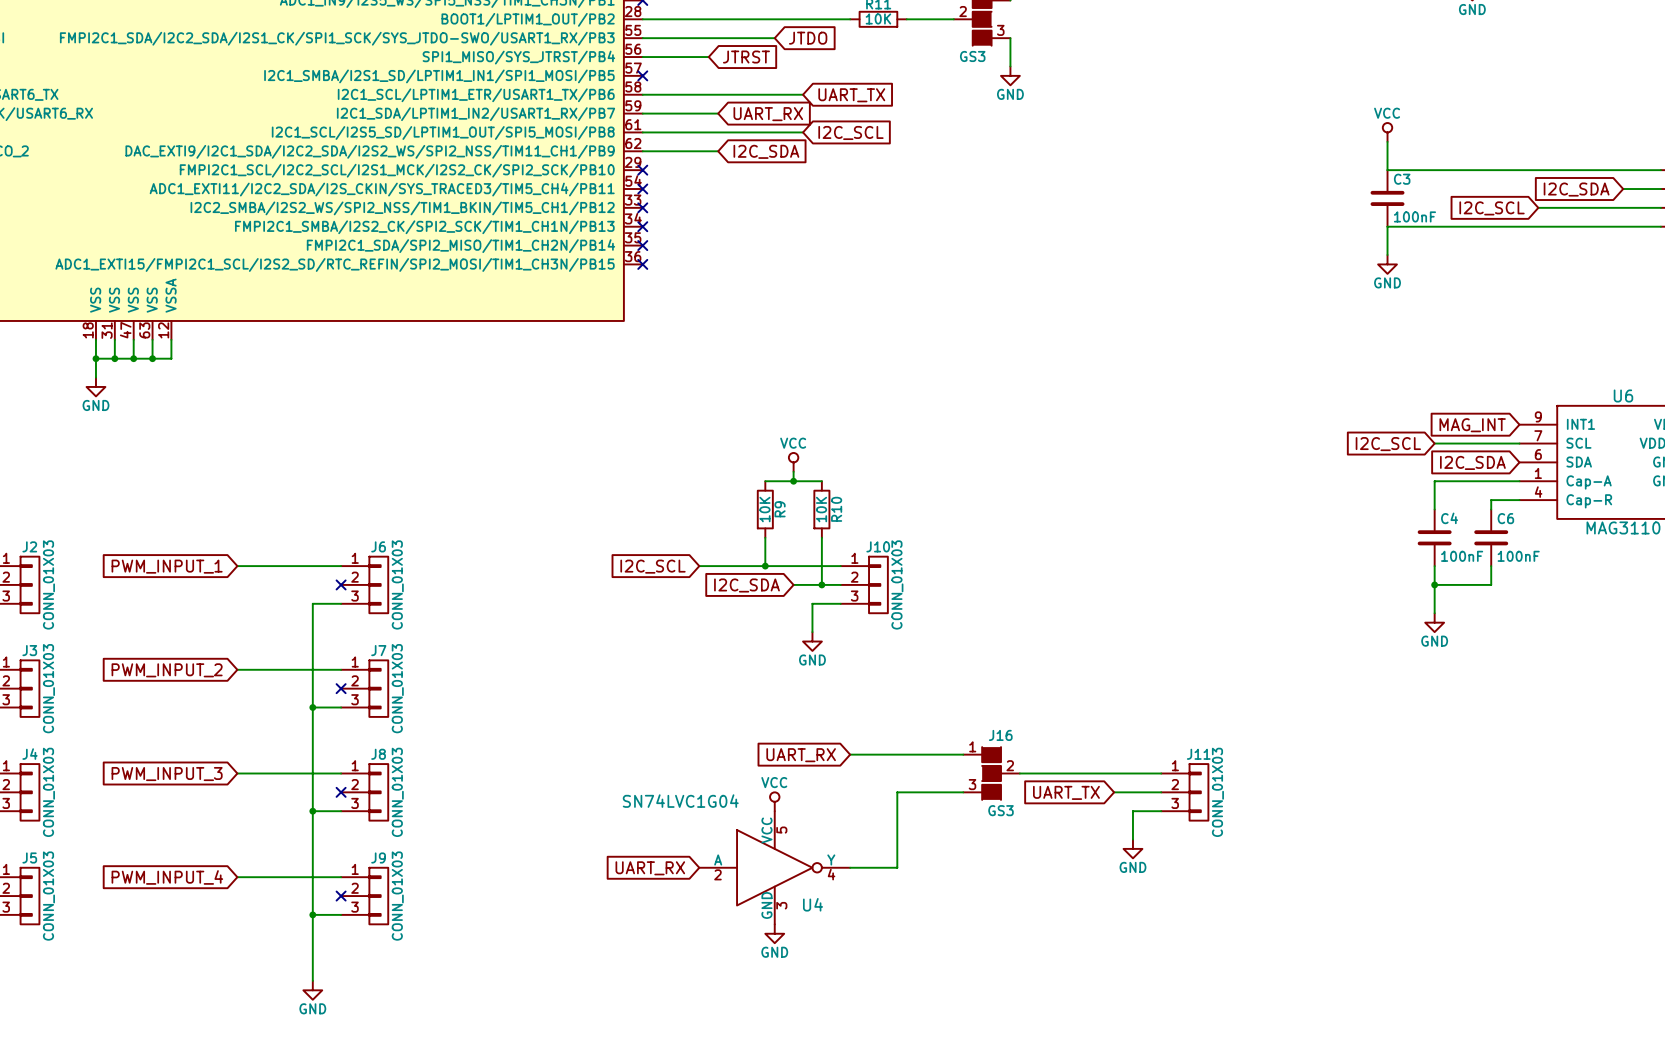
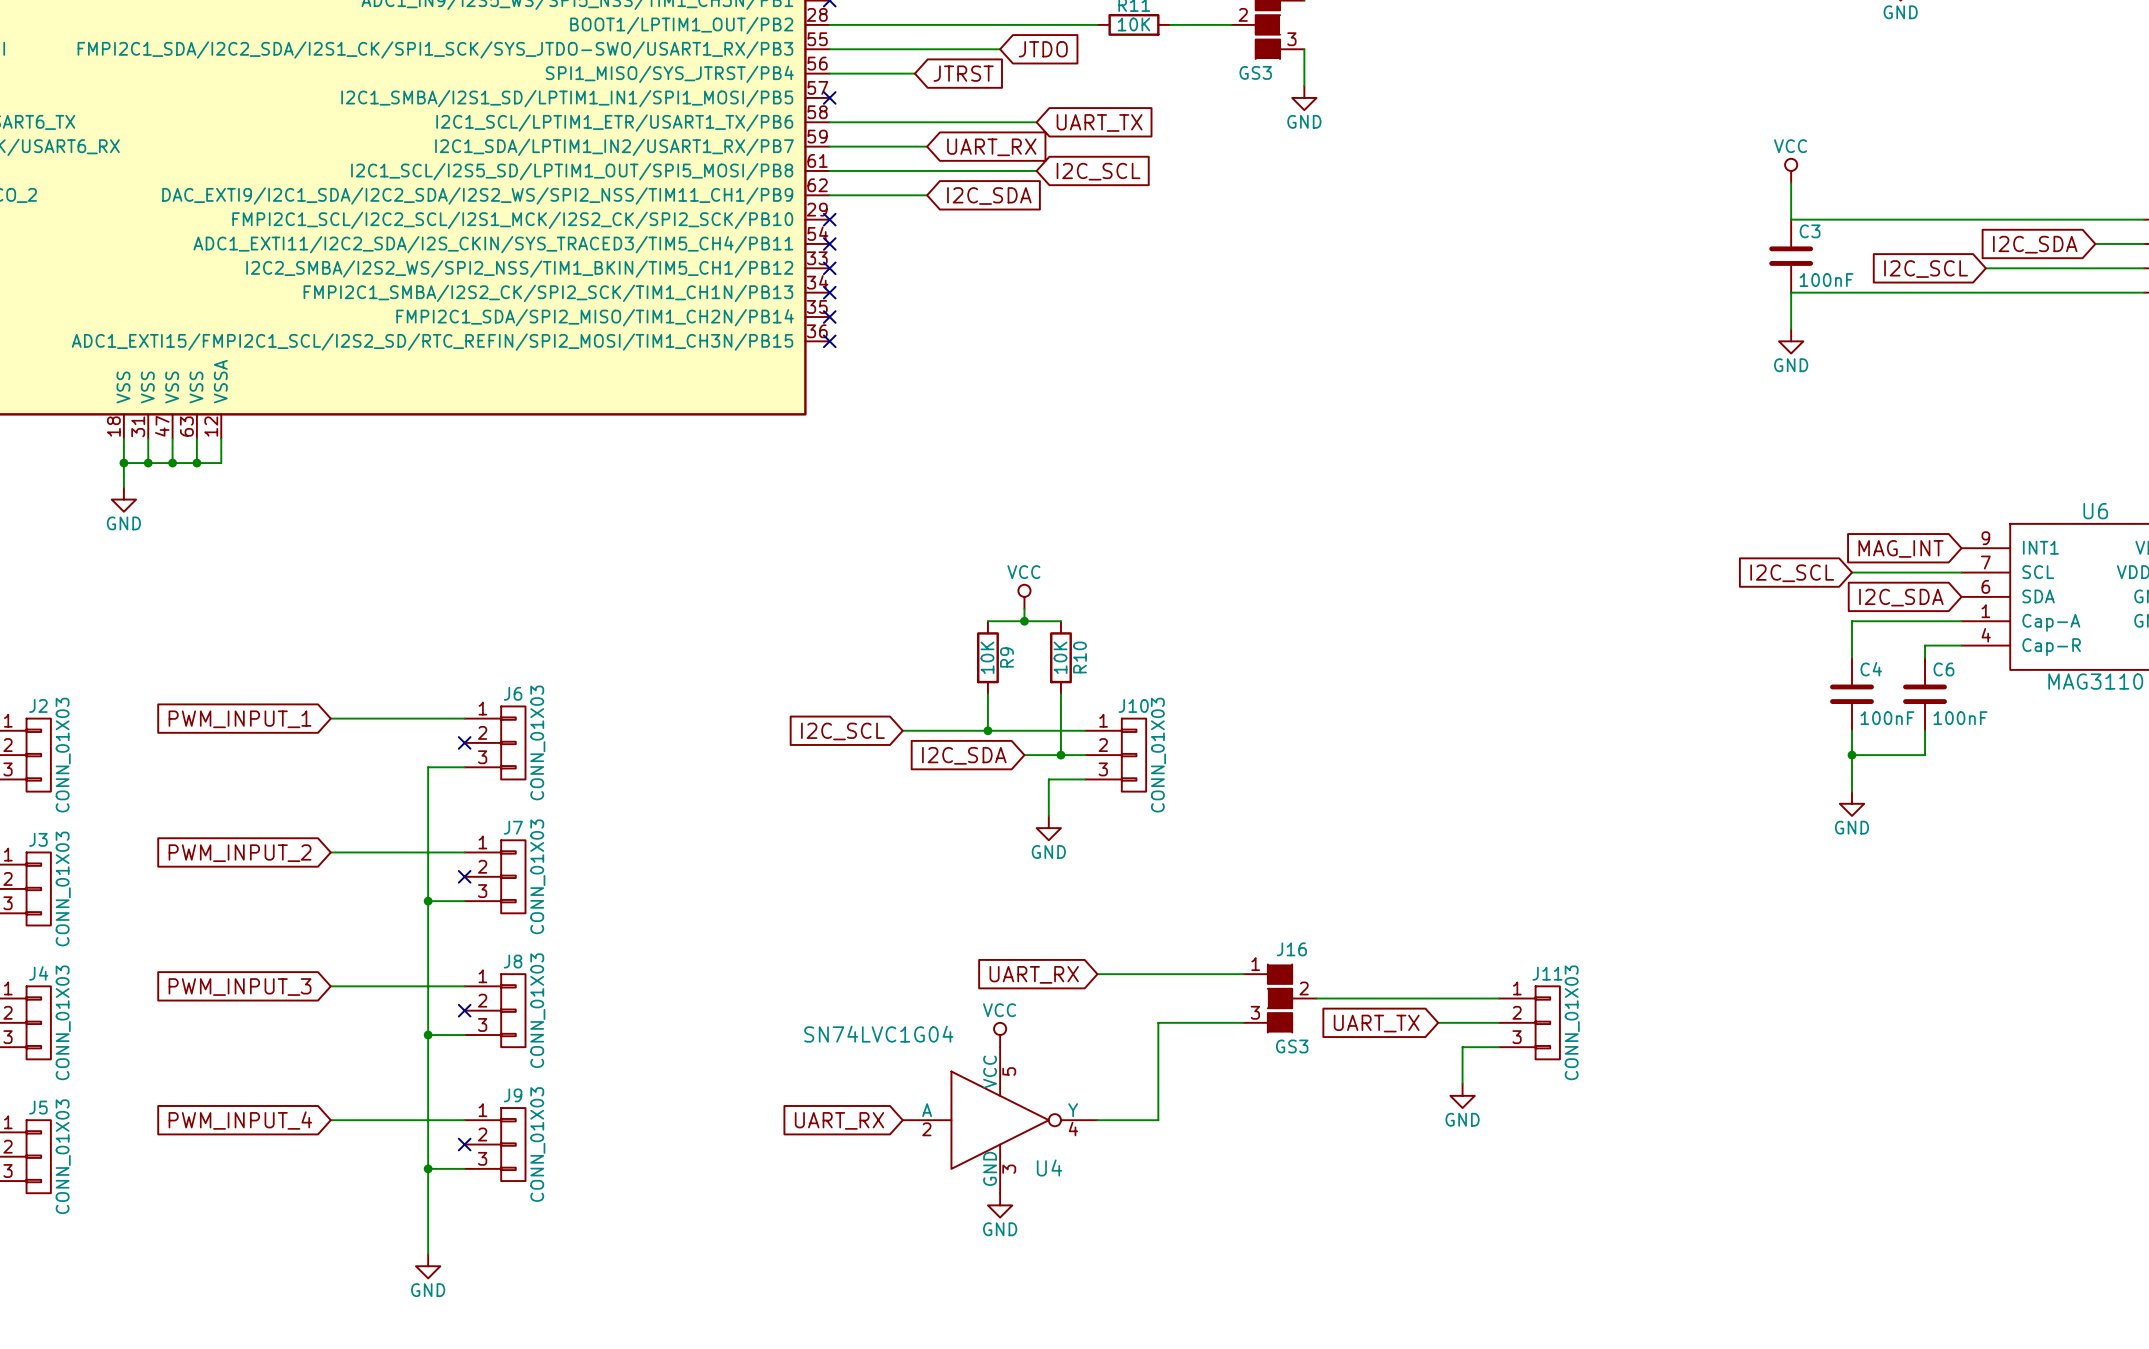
global label position: PWM_INPUT_1 (167, 566) -> PWM_INPUT_1 (240, 719)
wire: (237, 566) (341, 566) -> (330, 718) (464, 718)
no-connect mark position: (341, 584) -> (464, 742)
J6 position: (364, 584) -> (495, 742)
wire: (341, 603) (312, 603) (312, 980) -> (464, 767) (428, 767) (428, 1254)
wire: (237, 669) (341, 669) -> (330, 852) (464, 852)
global label position: PWM_INPUT_2 (167, 670) -> PWM_INPUT_2 (240, 853)
no-connect mark position: (341, 688) -> (464, 876)
J7 position: (364, 688) -> (495, 876)
wire: (312, 707) (341, 707) -> (428, 901) (464, 901)
junction position: (312, 707) -> (428, 901)
wire: (237, 773) (341, 773) -> (330, 986) (464, 986)
global label position: PWM_INPUT_3 (167, 774) -> PWM_INPUT_3 (240, 987)
no-connect mark position: (341, 792) -> (464, 1010)
J8 position: (364, 792) -> (495, 1010)
wire: (312, 811) (341, 811) -> (428, 1035) (464, 1035)
junction position: (312, 811) -> (428, 1035)
global label position: PWM_INPUT_4 (167, 877) -> PWM_INPUT_4 (240, 1120)
wire: (237, 877) (341, 877) -> (330, 1120) (464, 1120)
no-connect mark position: (341, 896) -> (464, 1144)
J9 position: (364, 896) -> (495, 1144)
wire: (312, 914) (341, 914) -> (428, 1168) (464, 1168)
junction position: (312, 914) -> (428, 1168)
power symbol position: GND (312, 990) -> GND (428, 1266)

